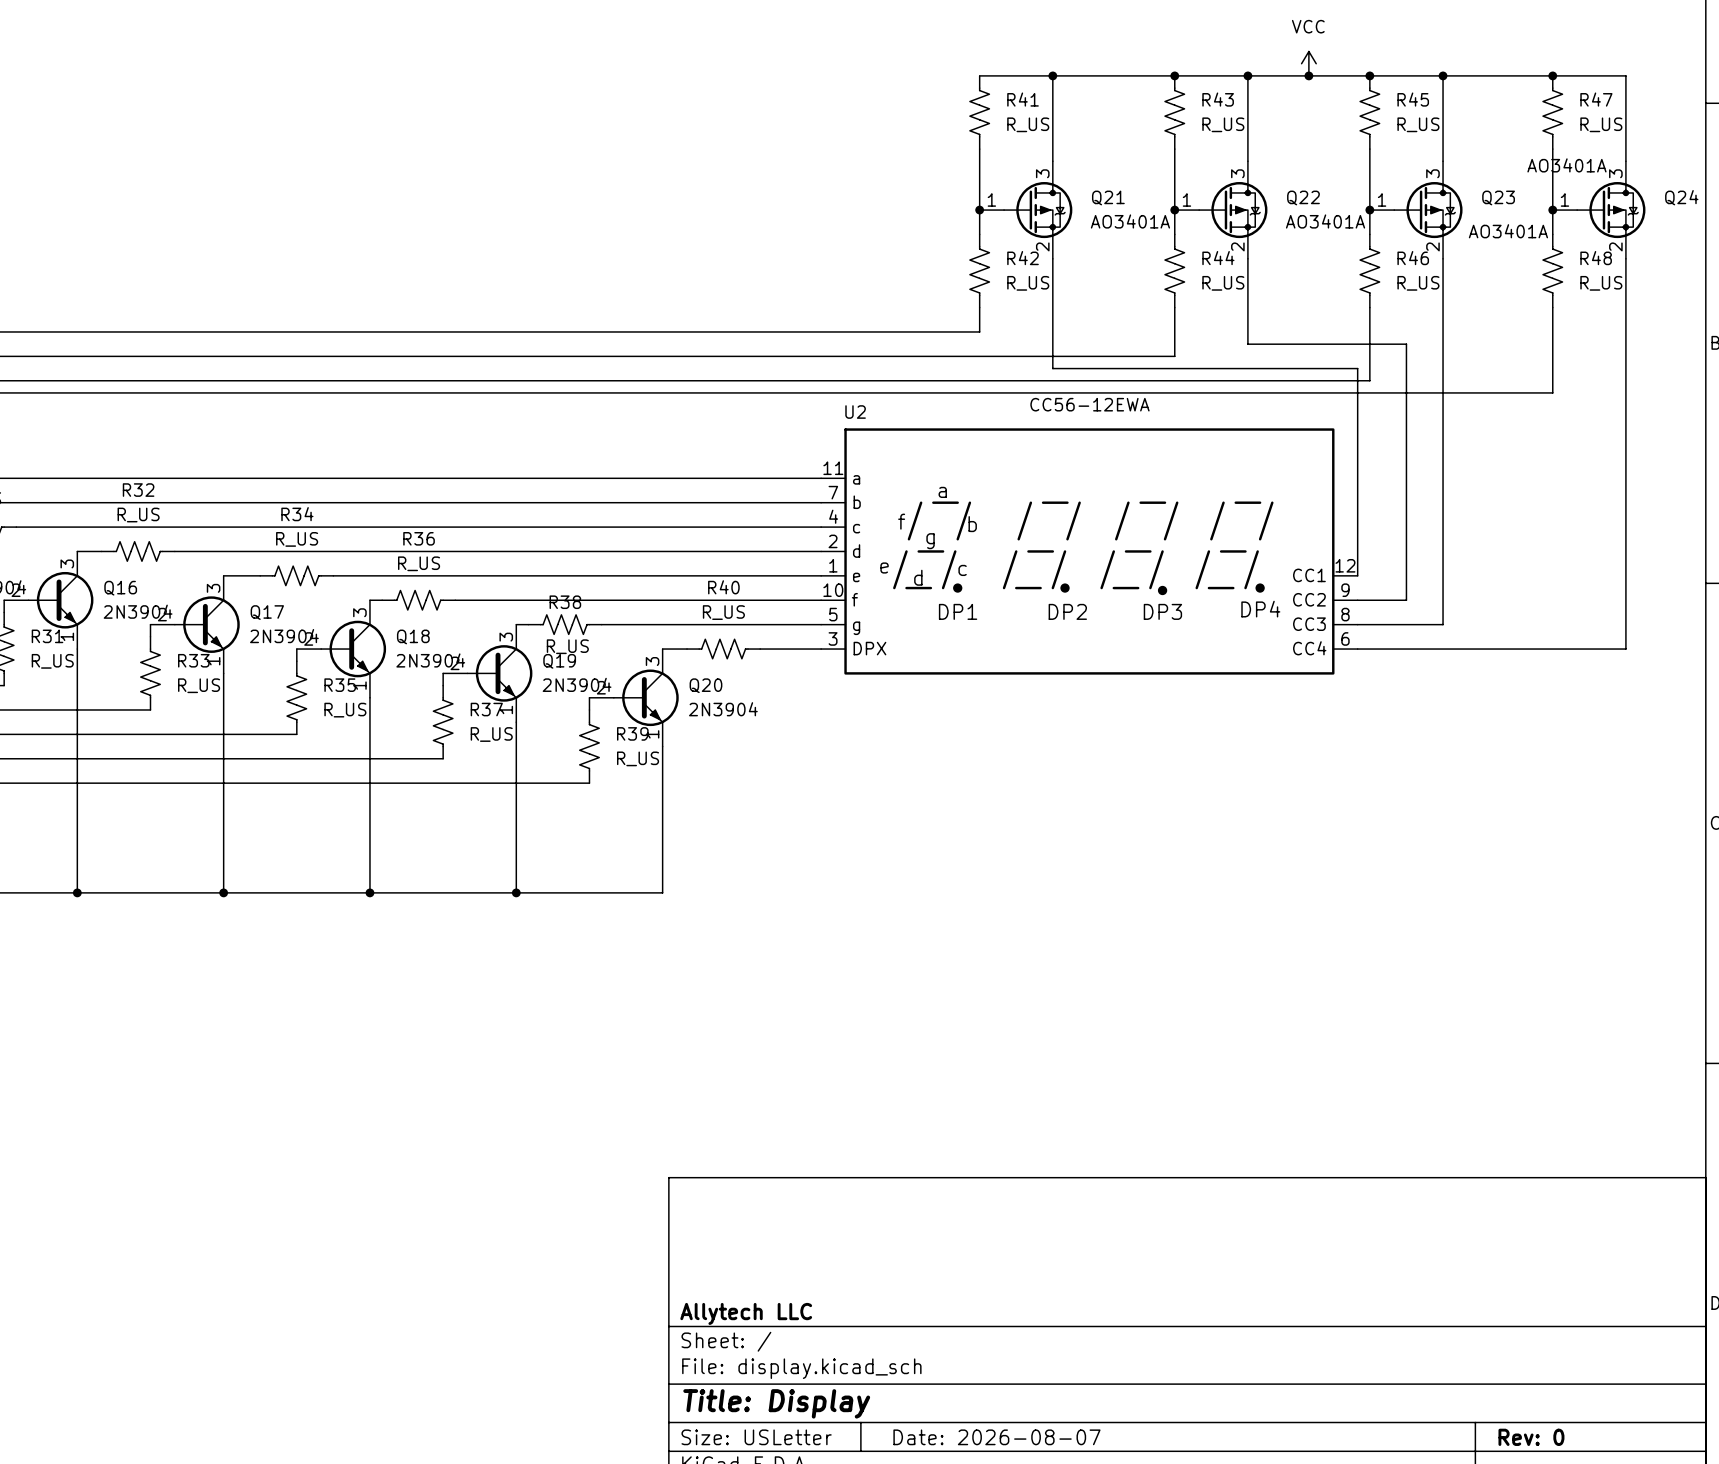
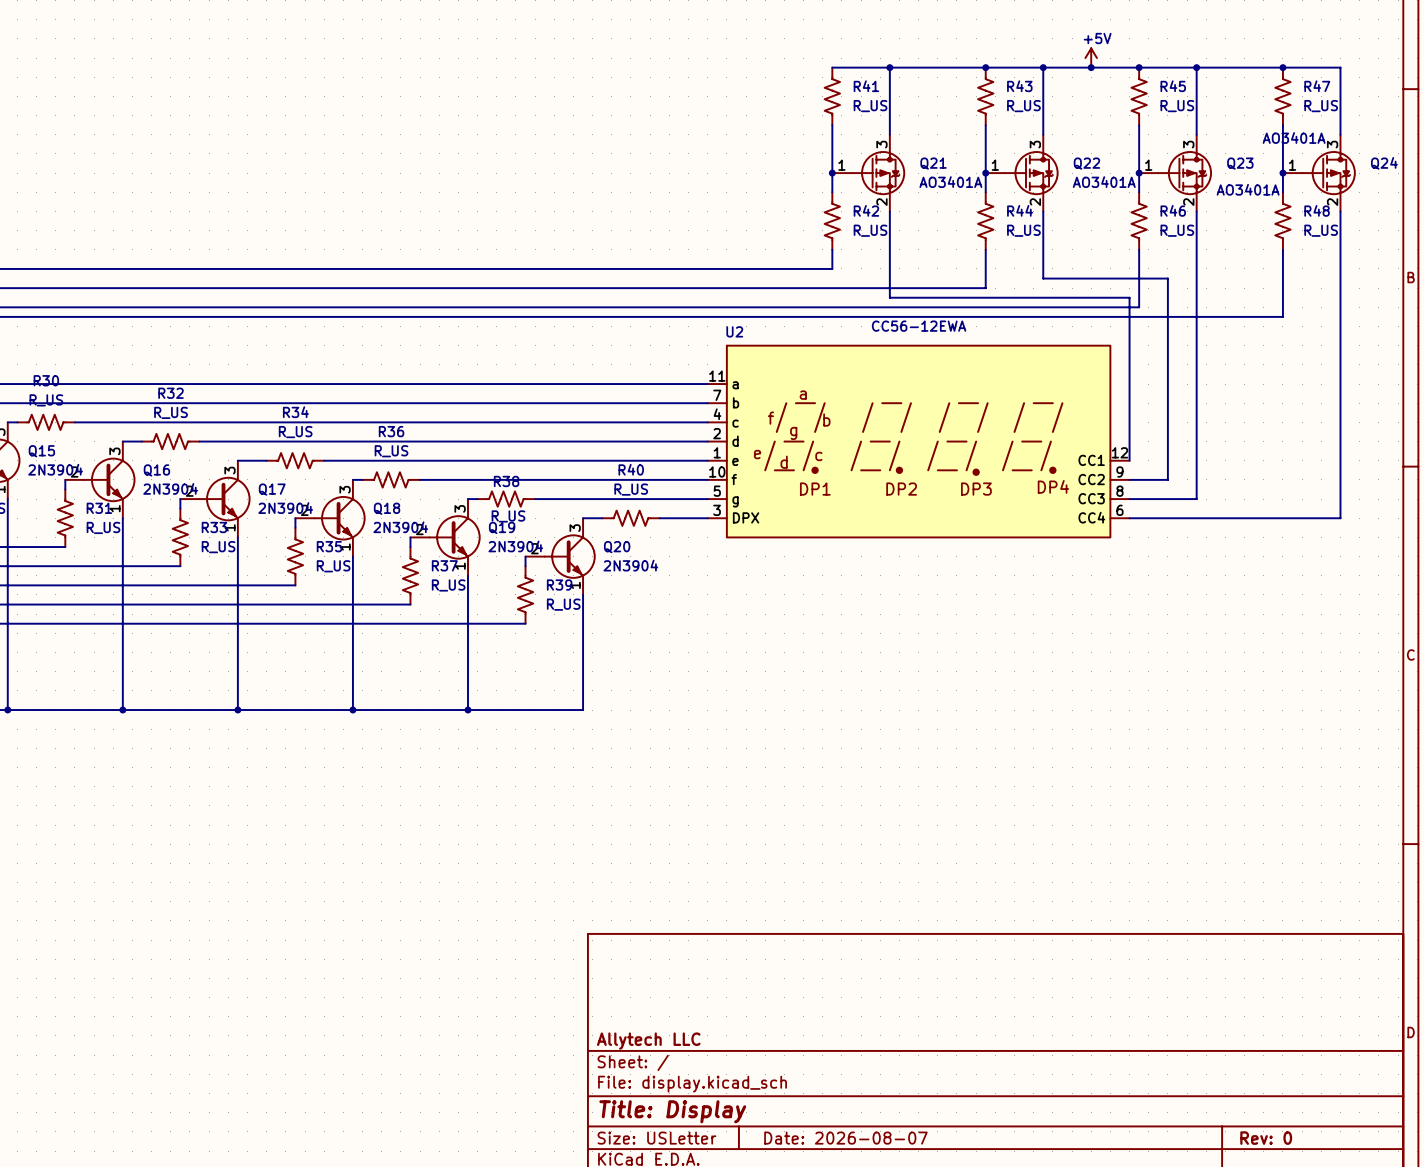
power symbol: VCC (1308, 63) -> +5V (1091, 58)

